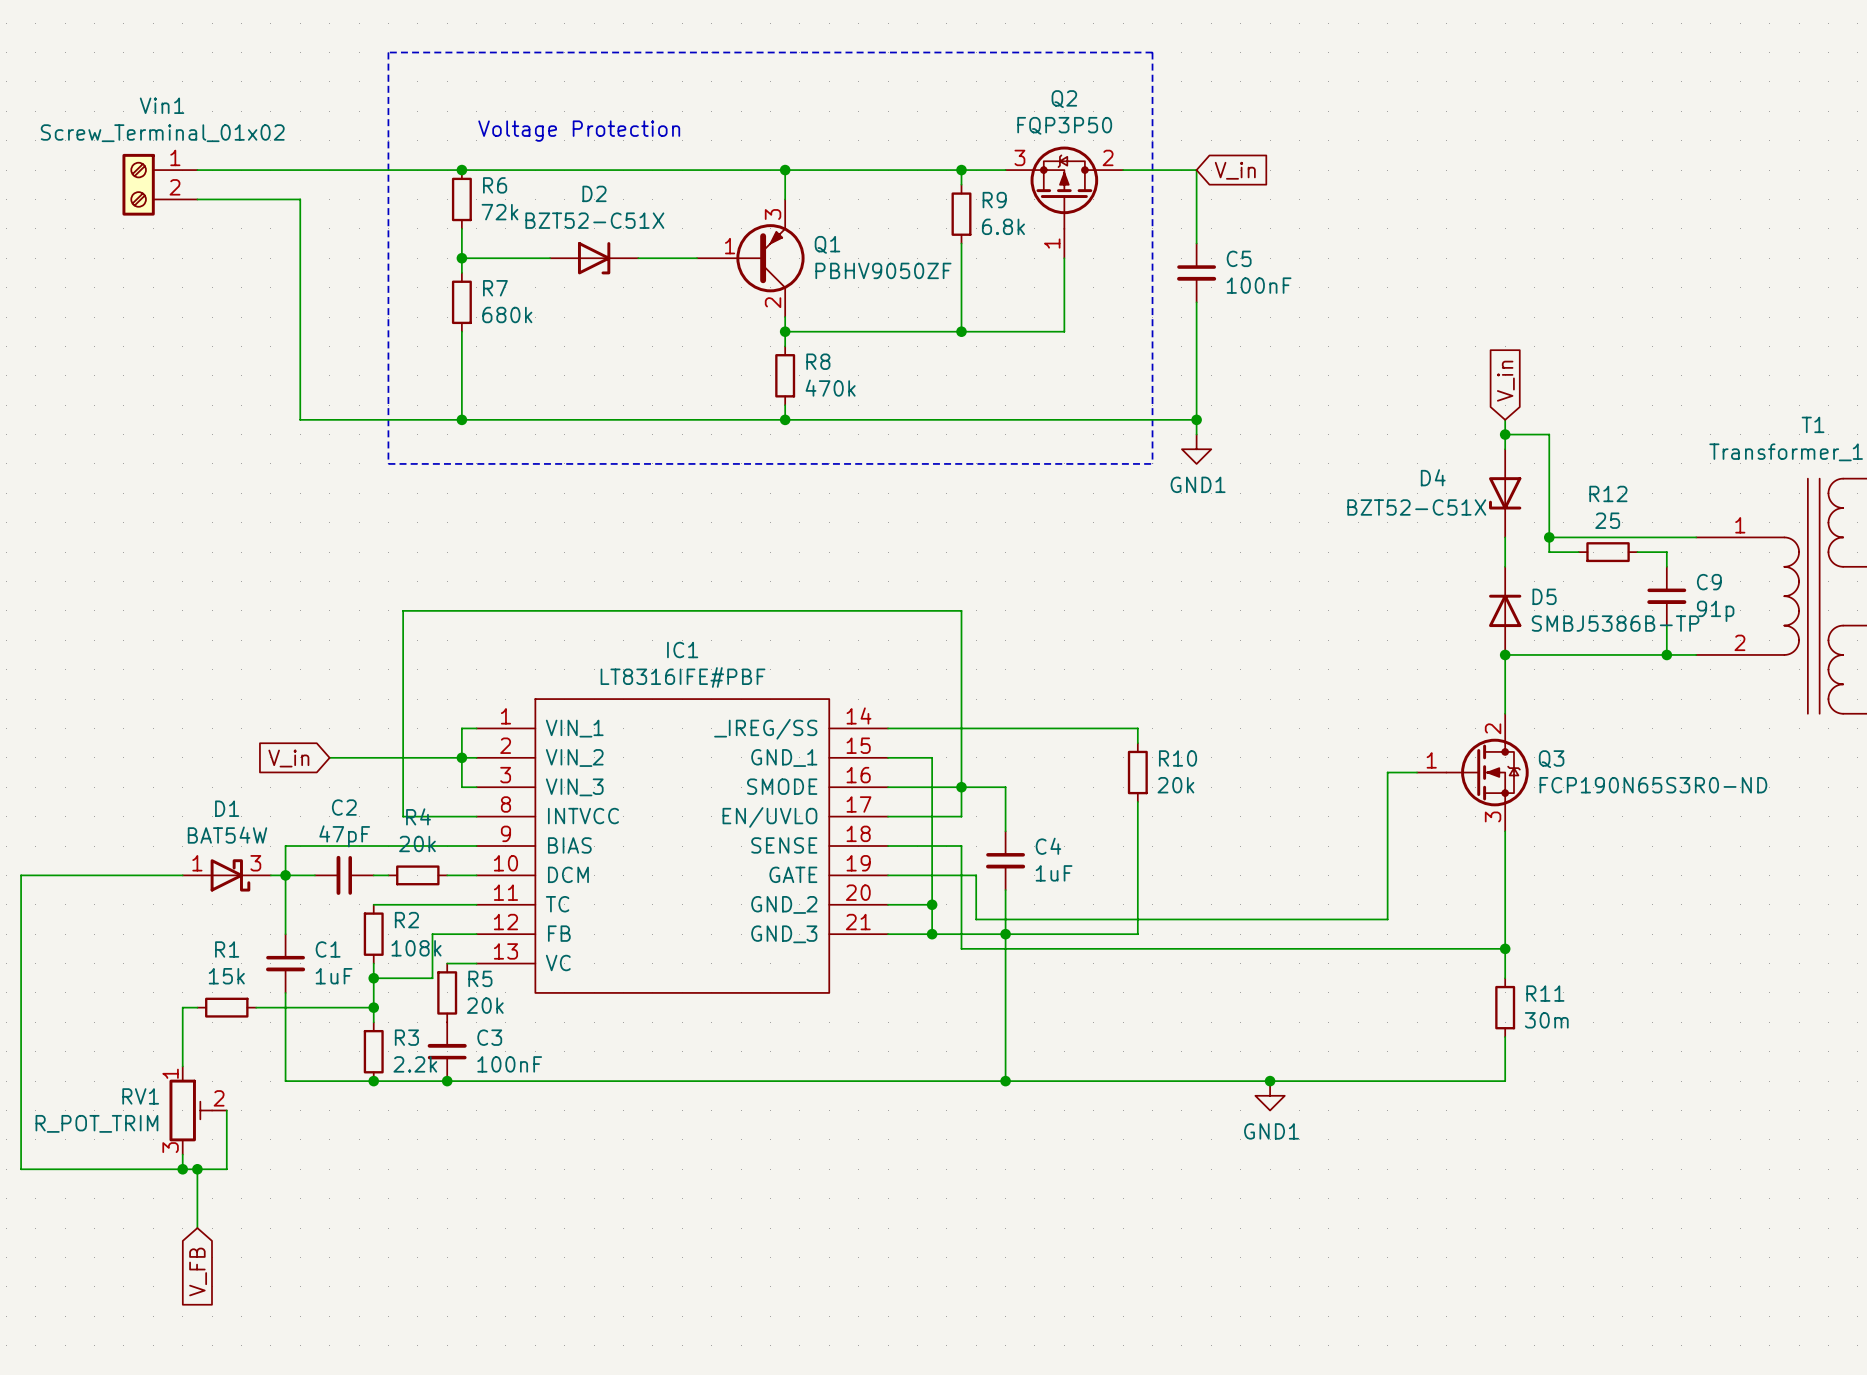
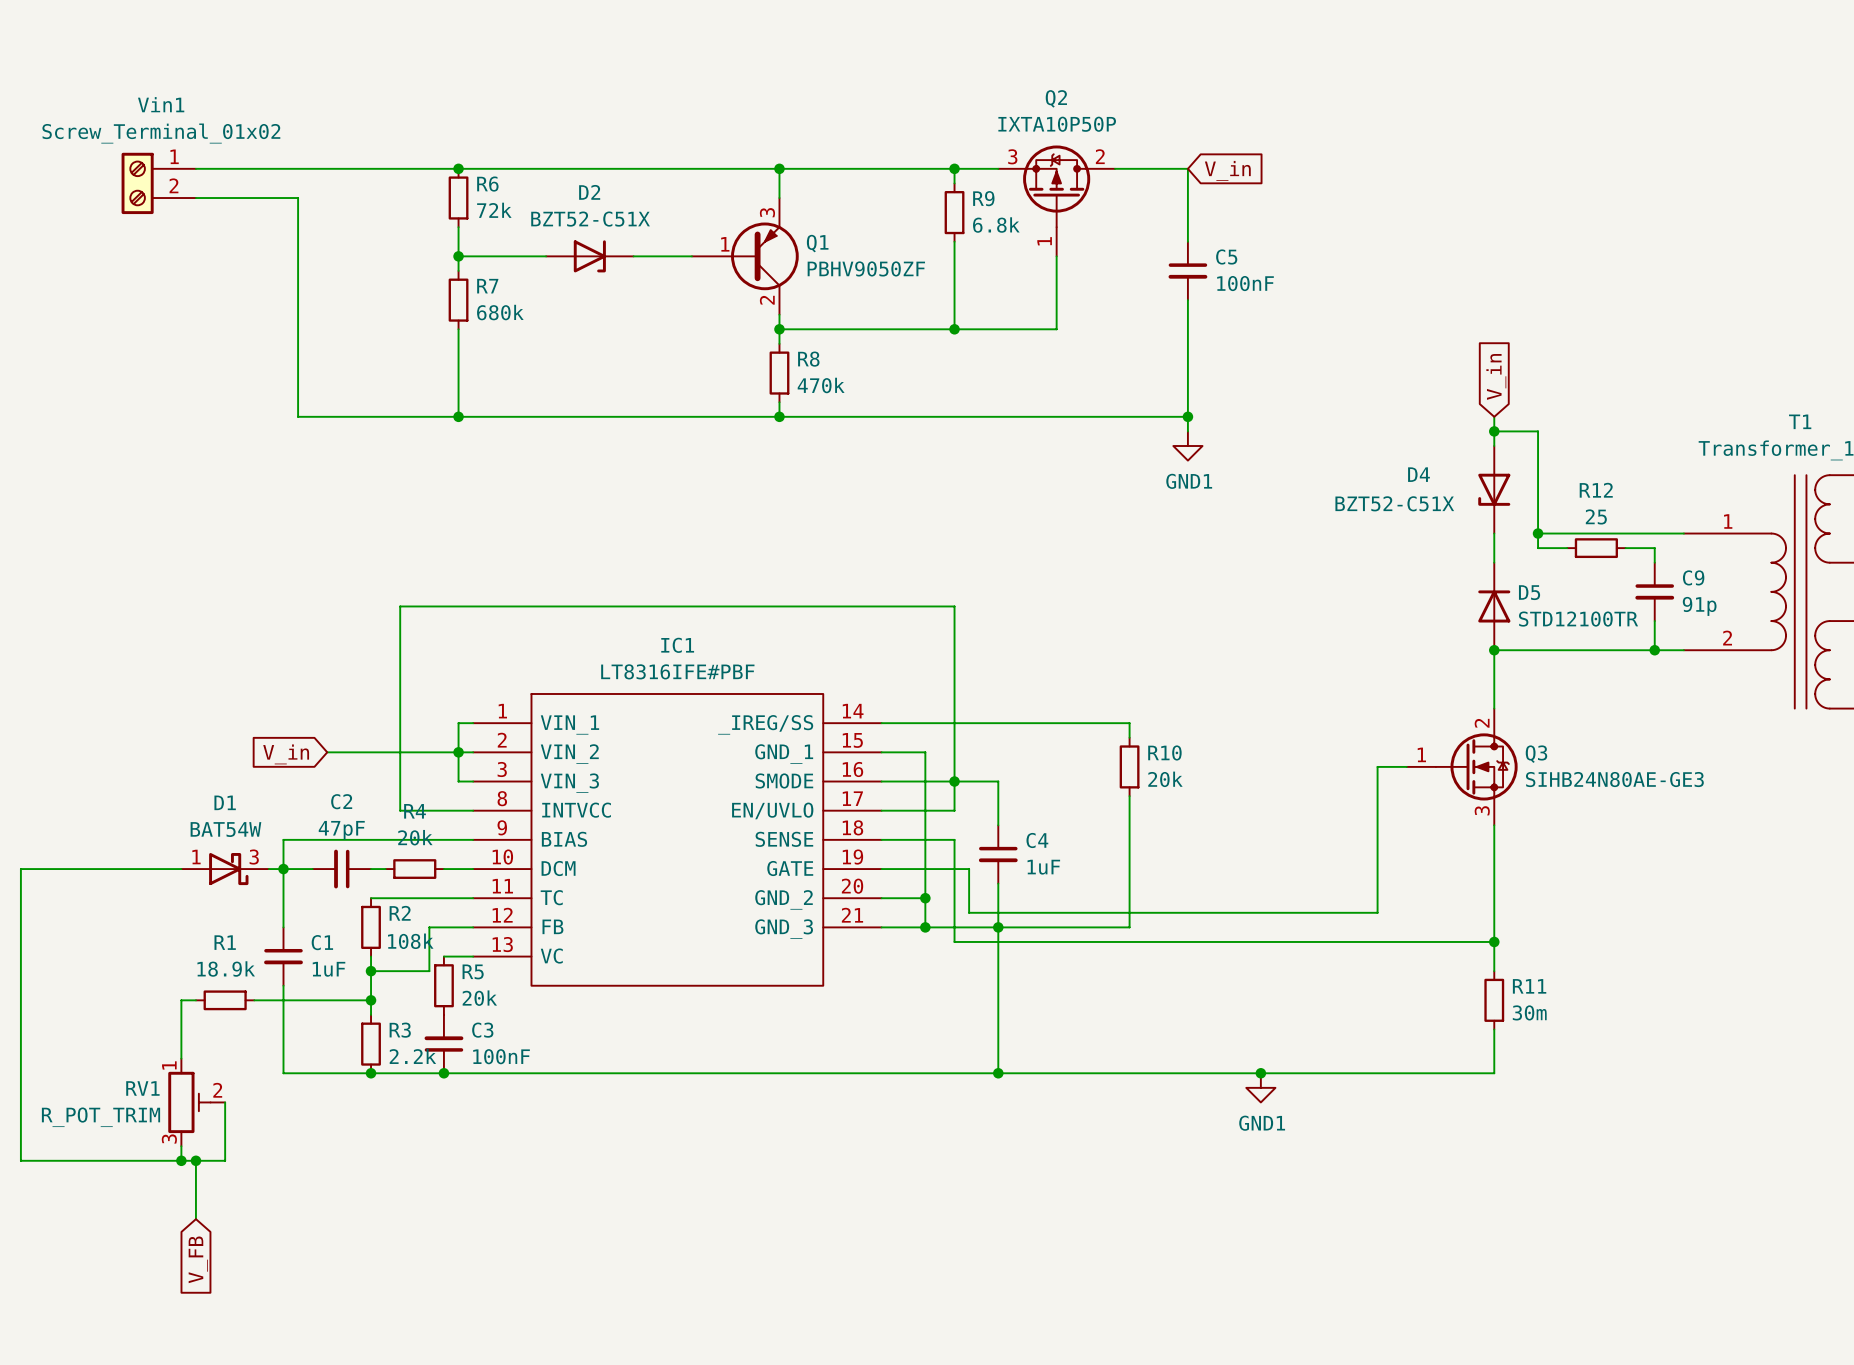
line: (388, 52) (1152, 52) (1152, 463) (388, 463) (388, 52) -> none
Q2 value: FQP3P50 (1064, 125) -> IXTA10P50P (1057, 124)
text: Voltage Protection (579, 131) -> none
D5 value: SMBJ5386B-TP (1615, 623) -> STD12100TR (1578, 619)
Q3 value: FCP190N65S3R0-ND (1653, 785) -> SIHB24N80AE-GE3 (1614, 779)
R1 value: 15k (226, 976) -> 18.9k (226, 968)

